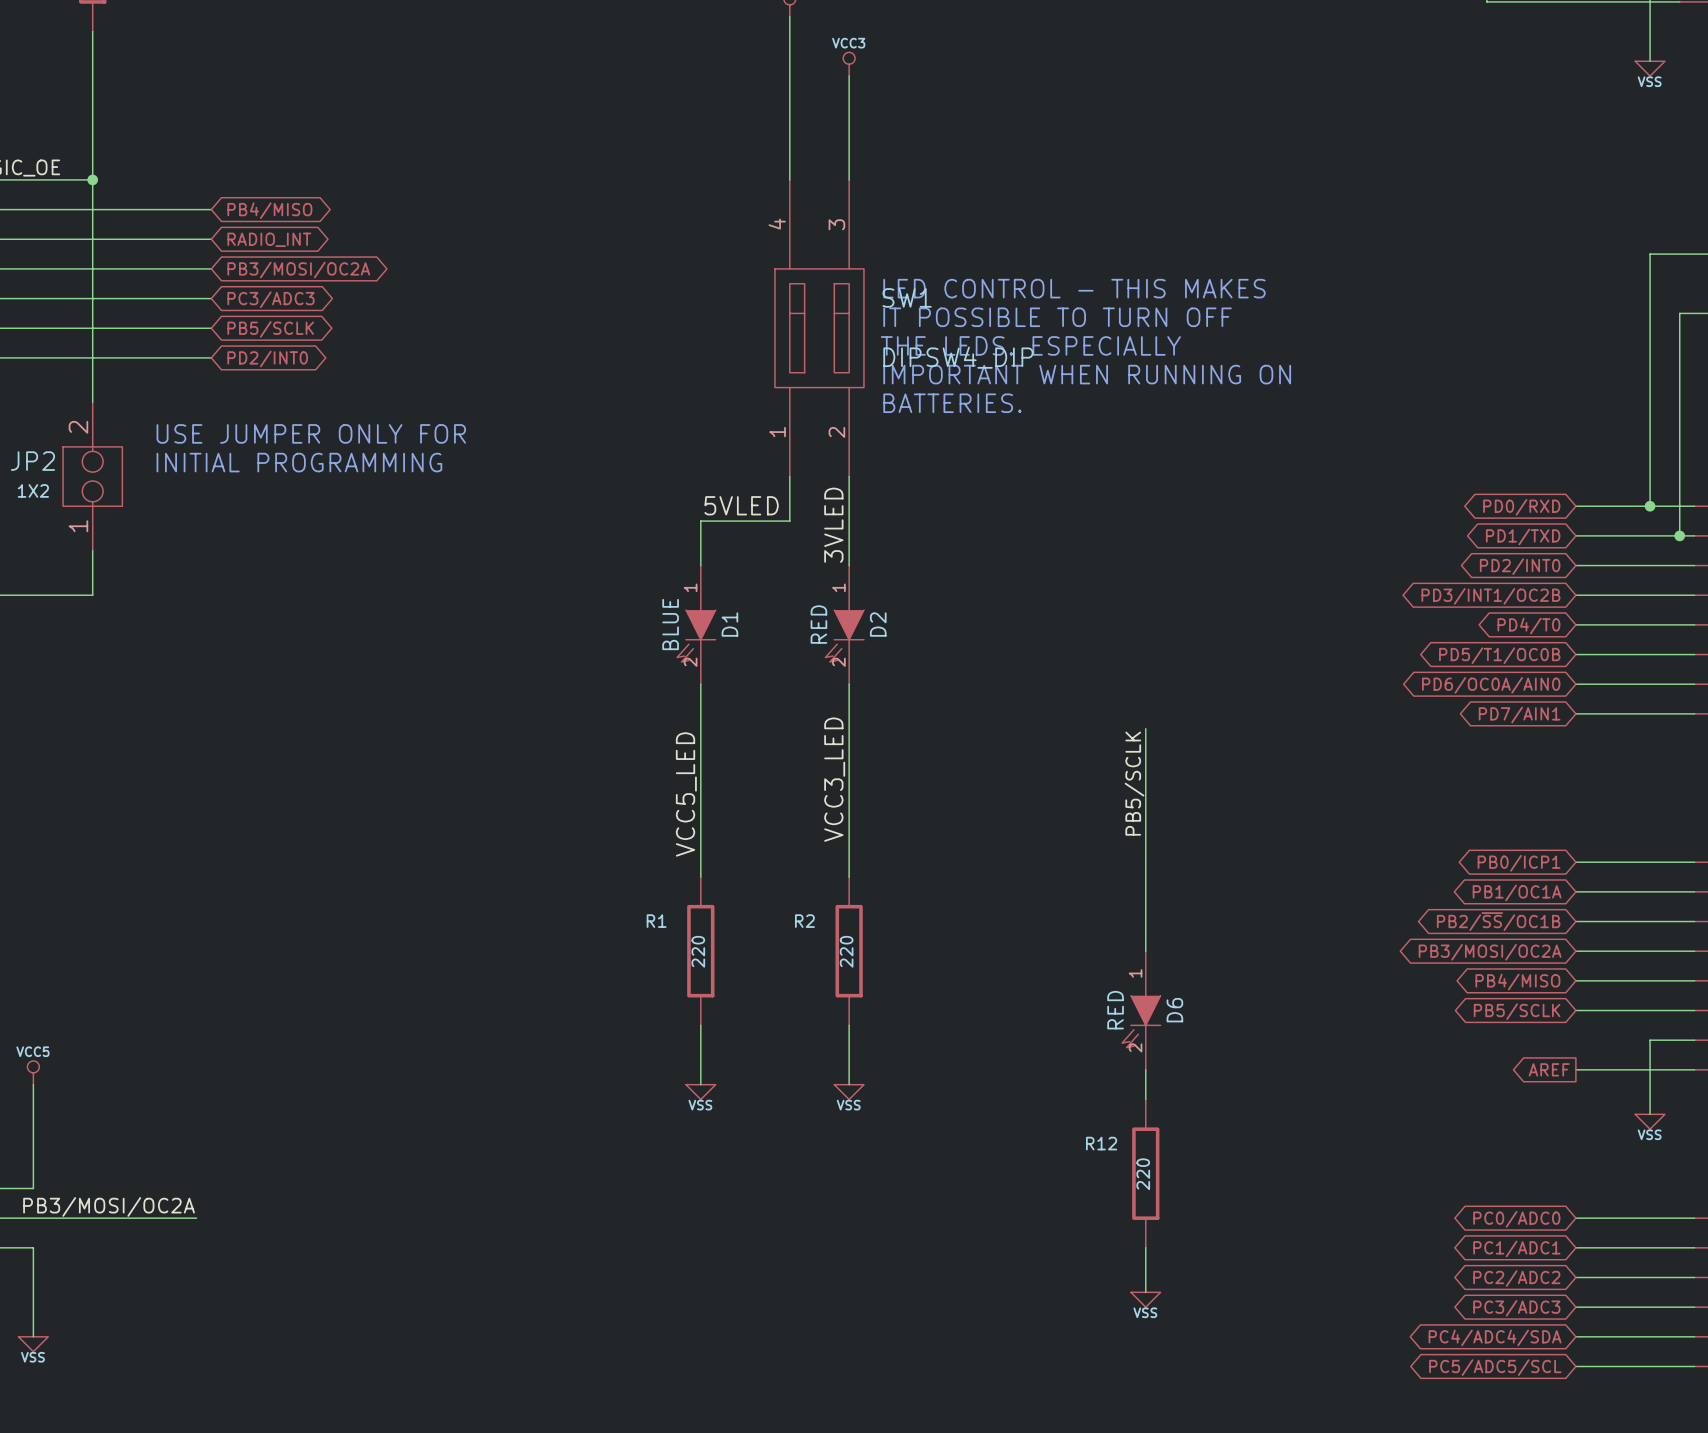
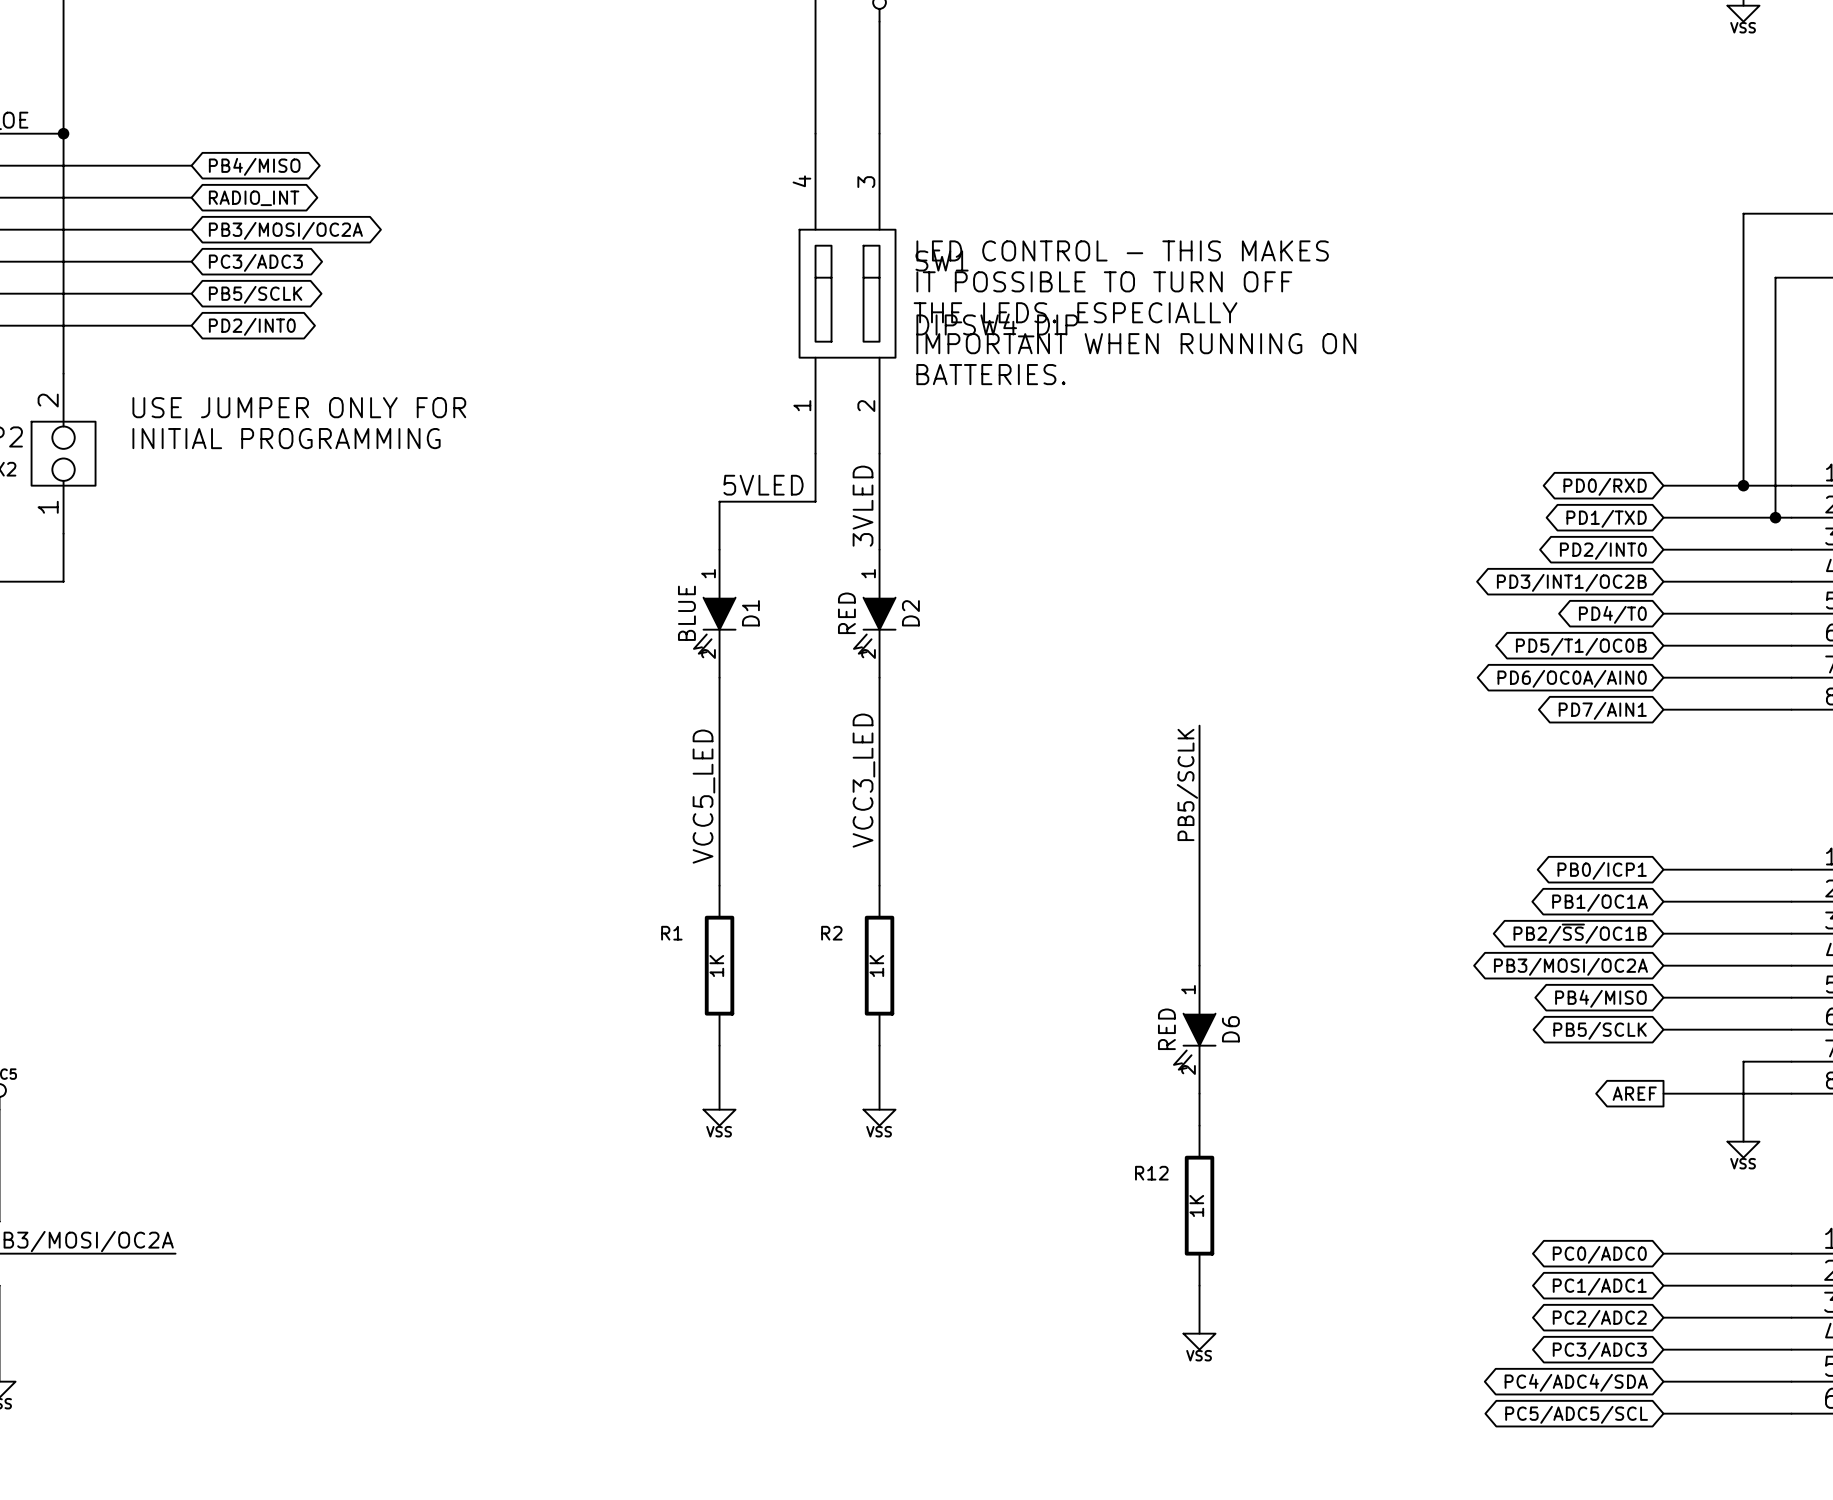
R1 value: 220 (698, 951) -> 1K (716, 965)
R2 value: 220 (846, 951) -> 1K (876, 965)
R12 value: 220 (1143, 1174) -> 1K (1196, 1205)

